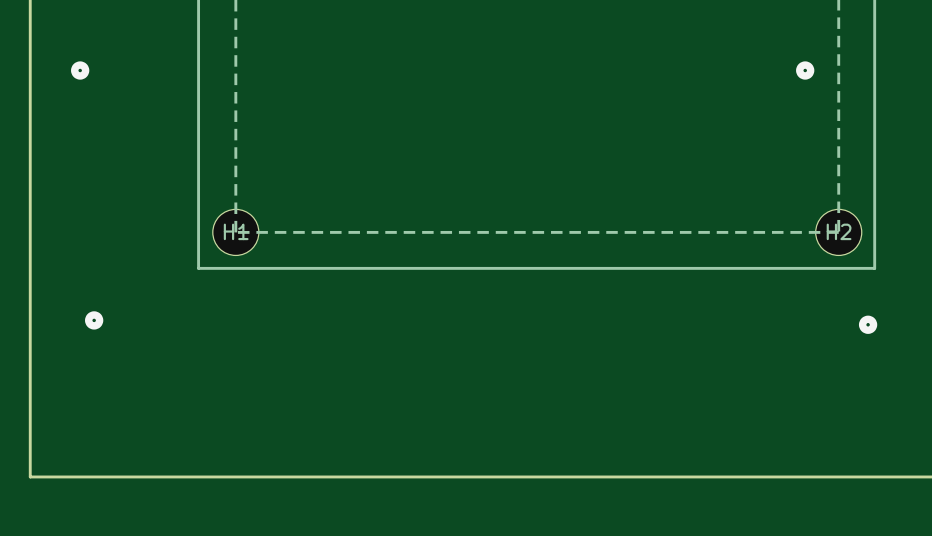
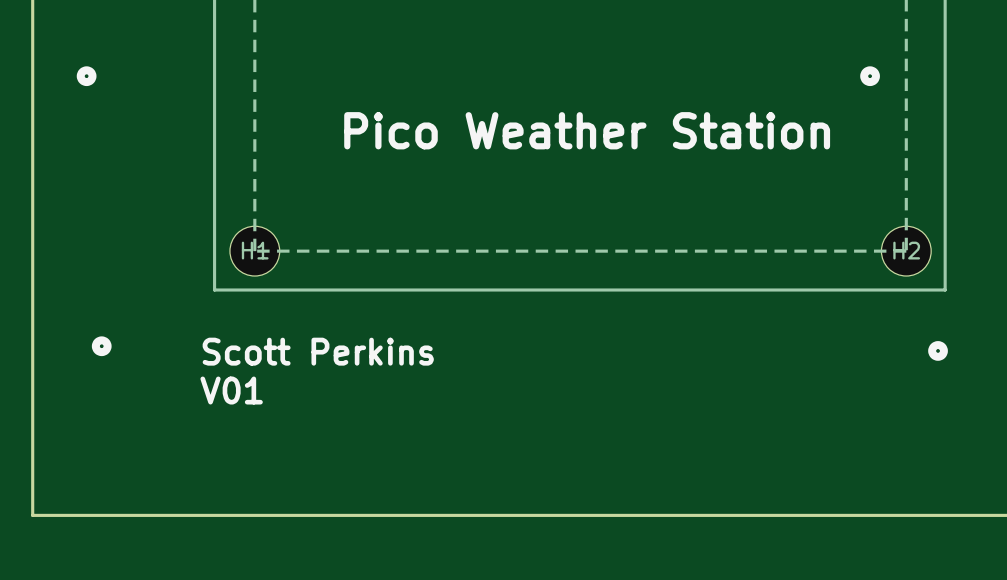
text: none -> Pico Weather Station (587, 130)
text: none -> Scott Perkins (318, 351)
text: none -> V01 (231, 390)

